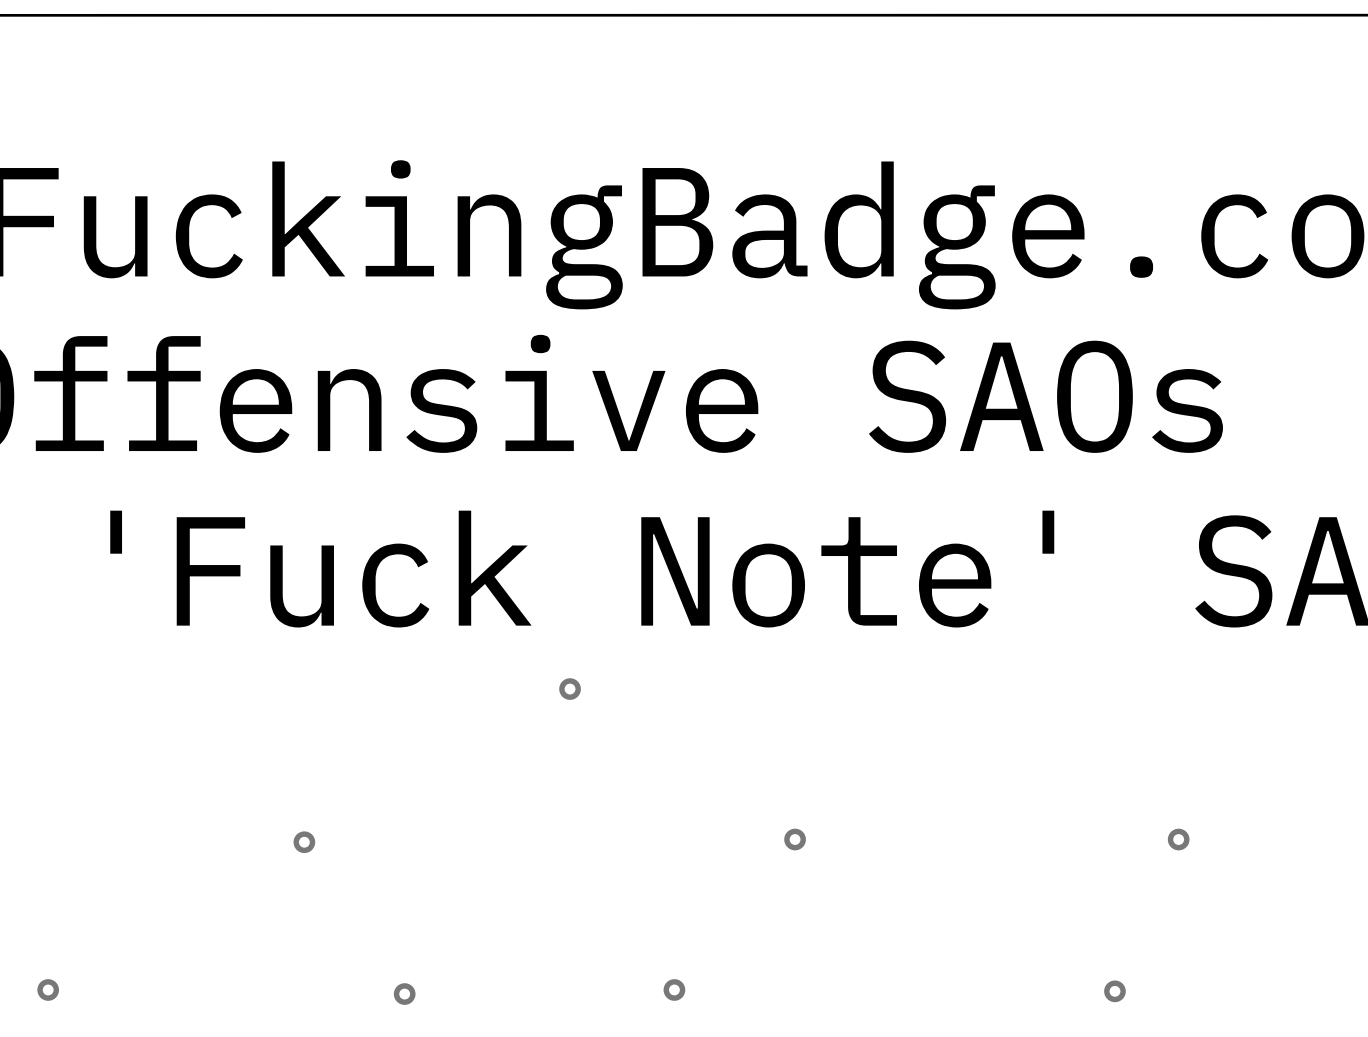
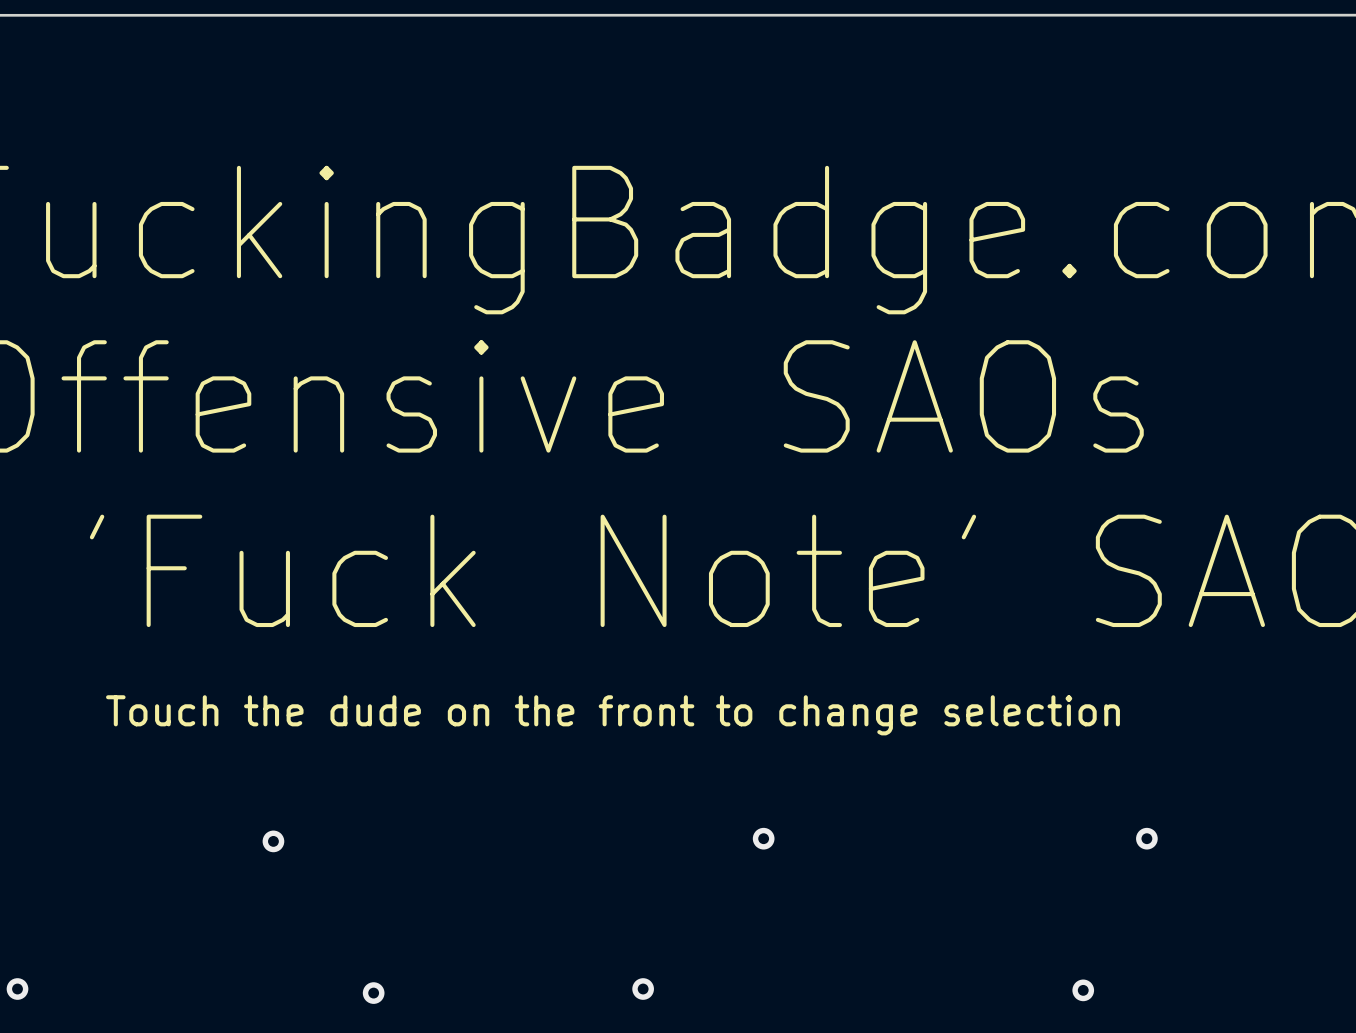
via: (570, 689) -> none
text: none -> Touch the dude on the front to change selection (612, 715)

